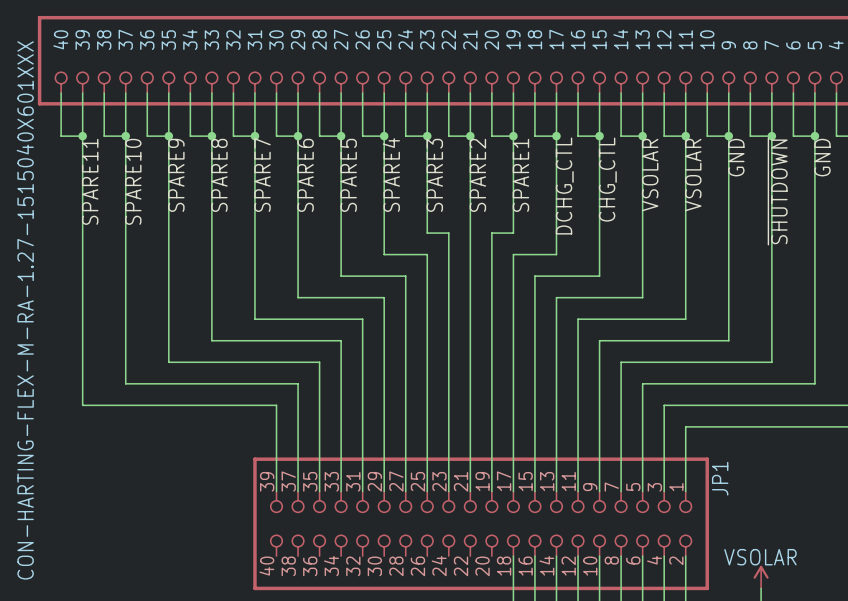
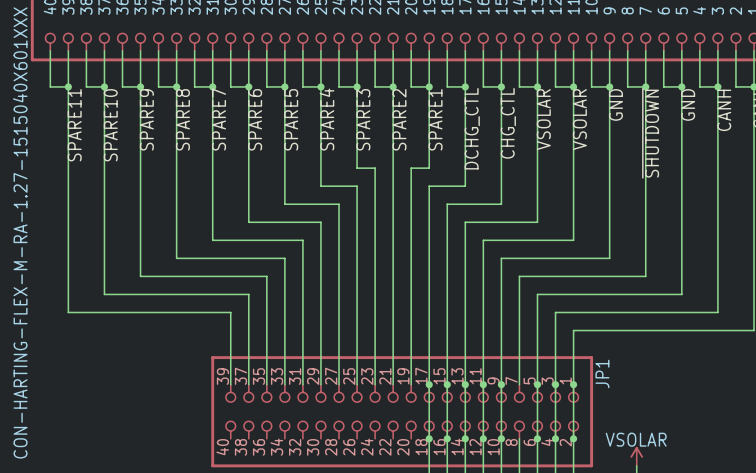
wire: none -> (429, 384) (429, 438)
junction: none -> (429, 384)
wire: none -> (447, 384) (447, 438)
junction: none -> (447, 384)
wire: none -> (465, 384) (465, 438)
junction: none -> (465, 384)
wire: none -> (483, 384) (483, 438)
junction: none -> (483, 384)
wire: none -> (501, 384) (501, 438)
junction: none -> (501, 384)
wire: none -> (537, 384) (537, 438)
junction: none -> (537, 384)
wire: none -> (555, 384) (555, 438)
junction: none -> (555, 384)
wire: none -> (573, 384) (573, 438)
junction: none -> (573, 384)
junction: none -> (429, 438)
junction: none -> (447, 438)
junction: none -> (465, 438)
junction: none -> (483, 438)
junction: none -> (501, 438)
junction: none -> (537, 438)
junction: none -> (555, 438)
junction: none -> (573, 438)

